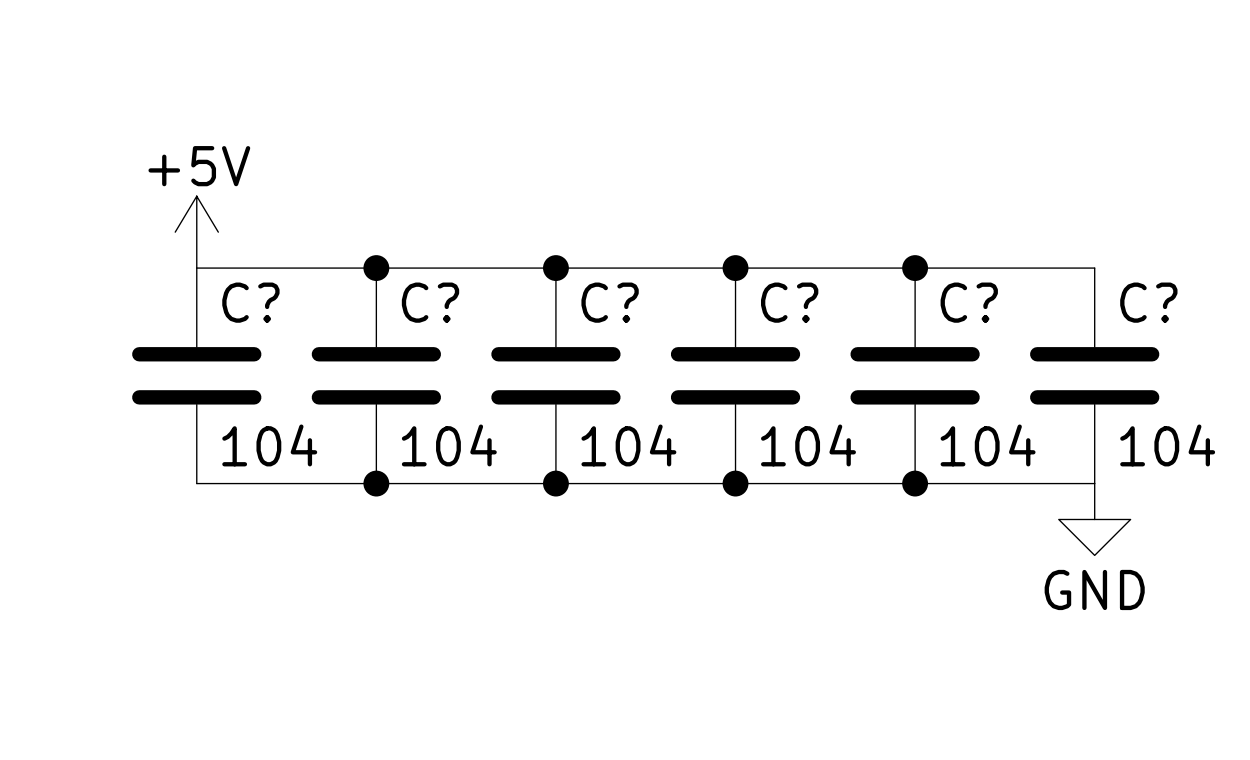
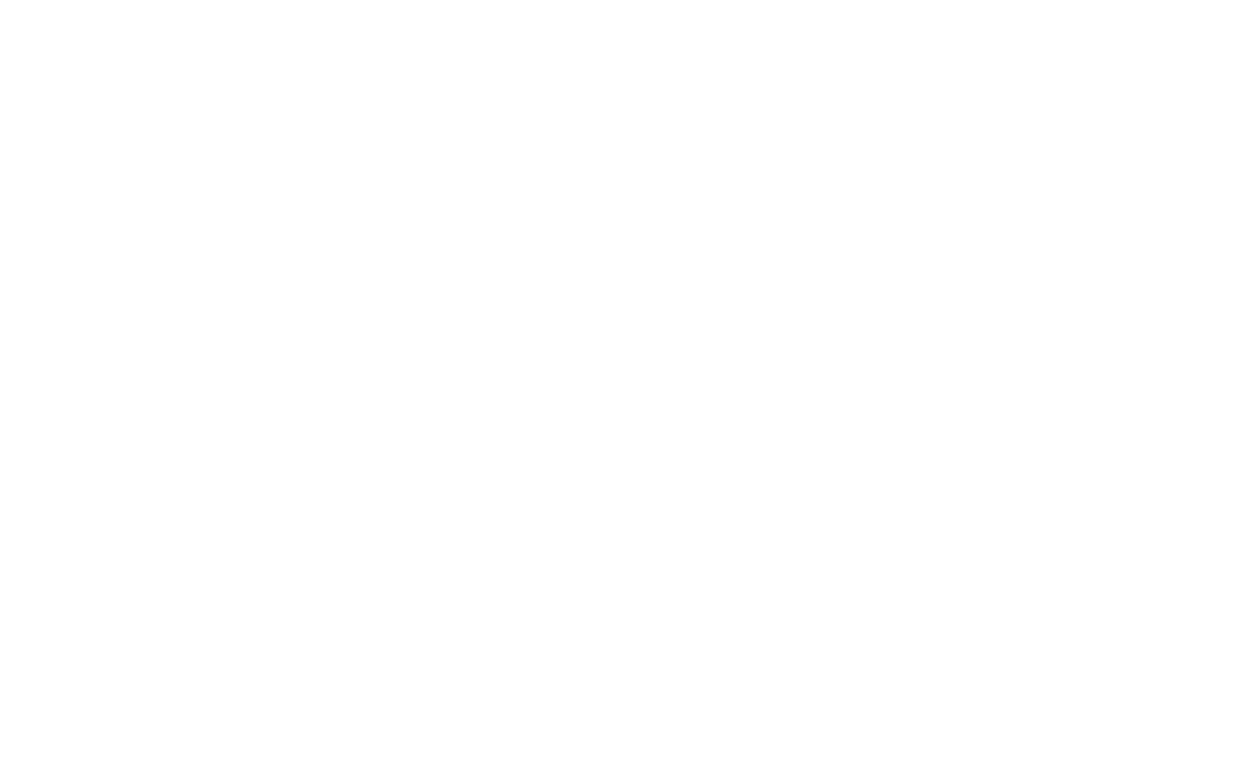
power symbol: +5V (196, 232) -> none
wire: (196, 268) (1094, 268) -> none
junction: (376, 268) -> none
junction: (555, 268) -> none
junction: (735, 268) -> none
junction: (915, 268) -> none
C?: 104 (196, 375) -> none
C?: 104 (376, 375) -> none
C?: 104 (555, 375) -> none
C?: 104 (735, 375) -> none
C?: 104 (915, 375) -> none
C?: 104 (1094, 375) -> none
wire: (196, 483) (1094, 483) -> none
junction: (376, 483) -> none
junction: (555, 483) -> none
junction: (735, 483) -> none
junction: (915, 483) -> none
power symbol: GND (1094, 519) -> none

